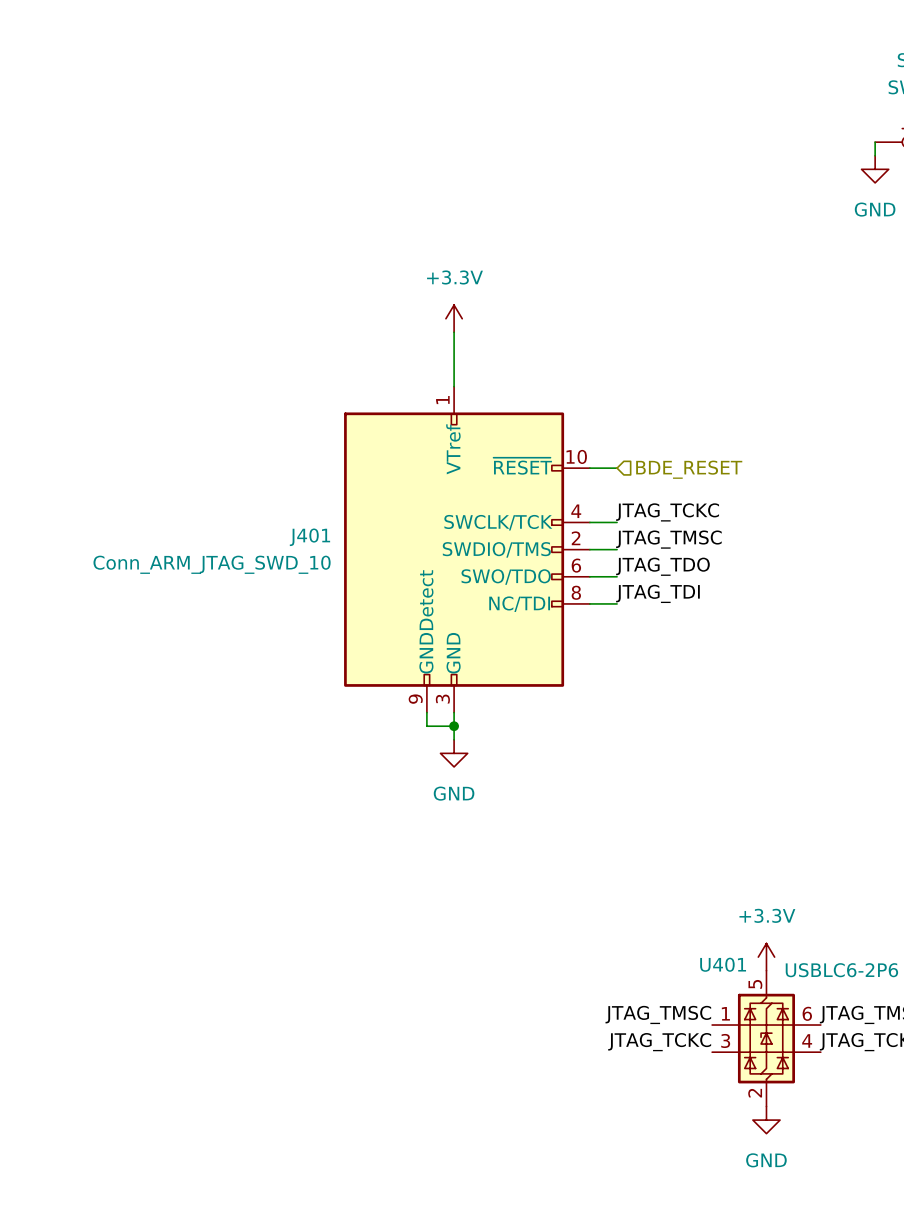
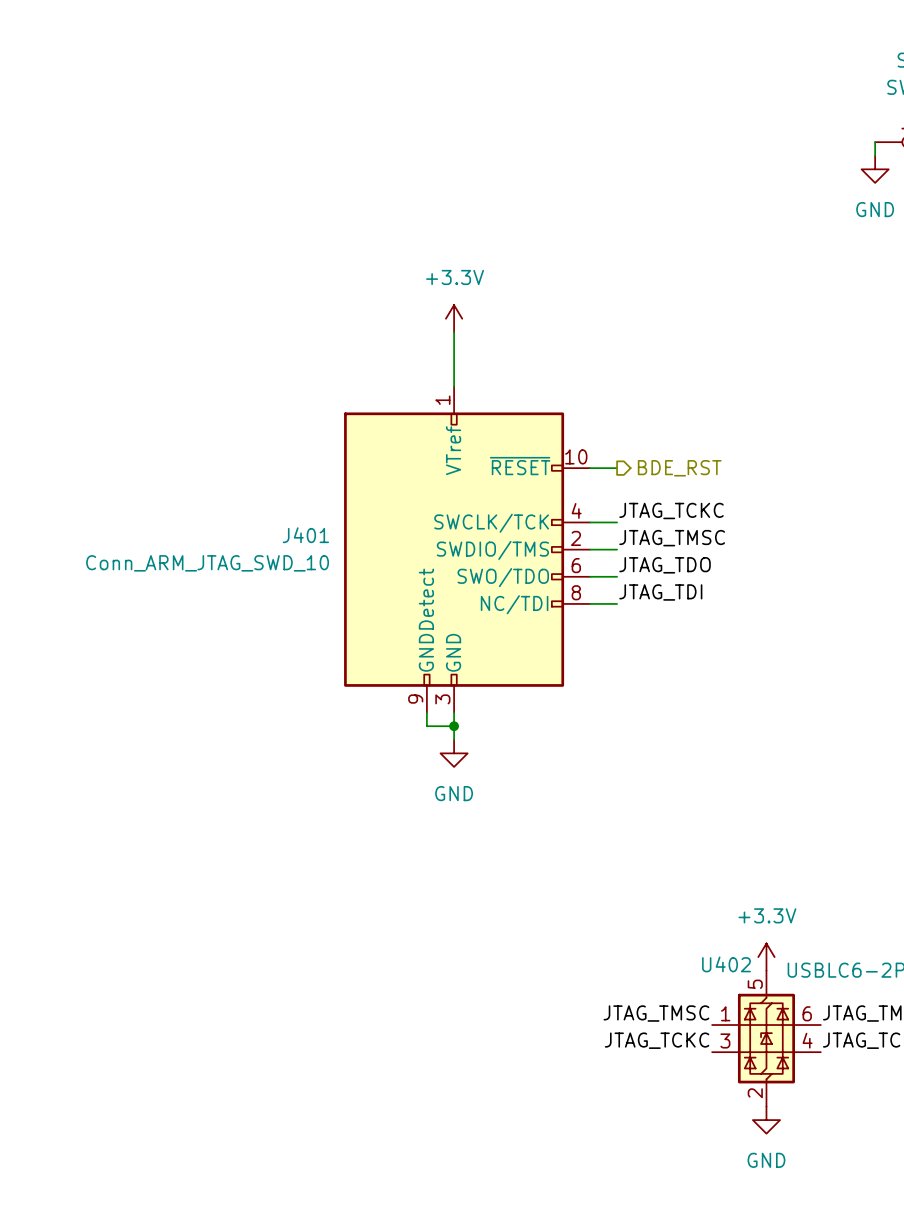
hierarchical label shape: input (689, 469) -> output (679, 468)
hierarchical label: BDE_RESET (689, 469) -> BDE_RST (679, 468)
U401 name: U401 (723, 964) -> U402 (726, 964)

